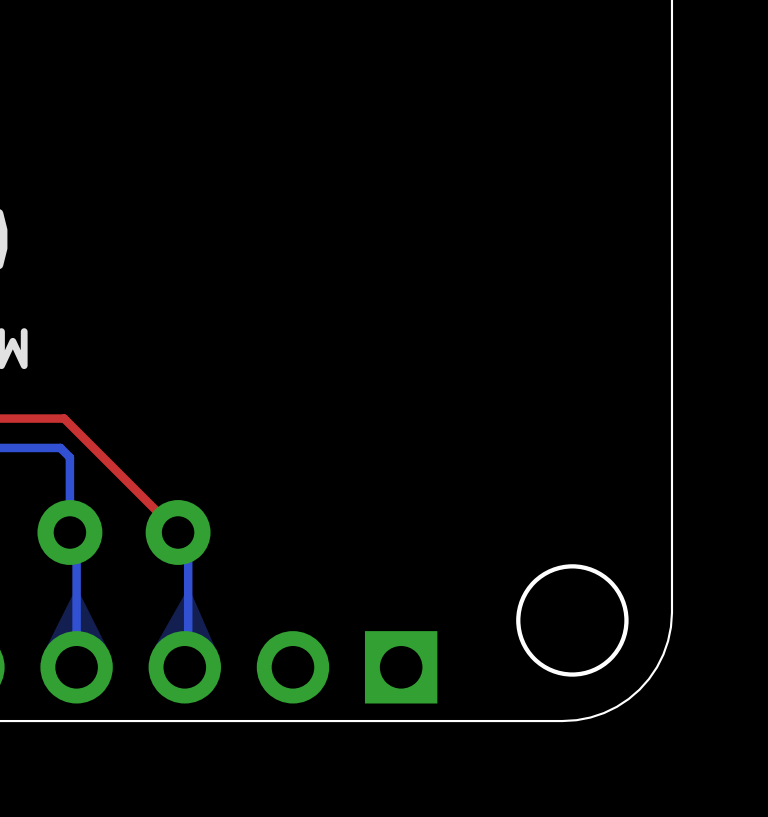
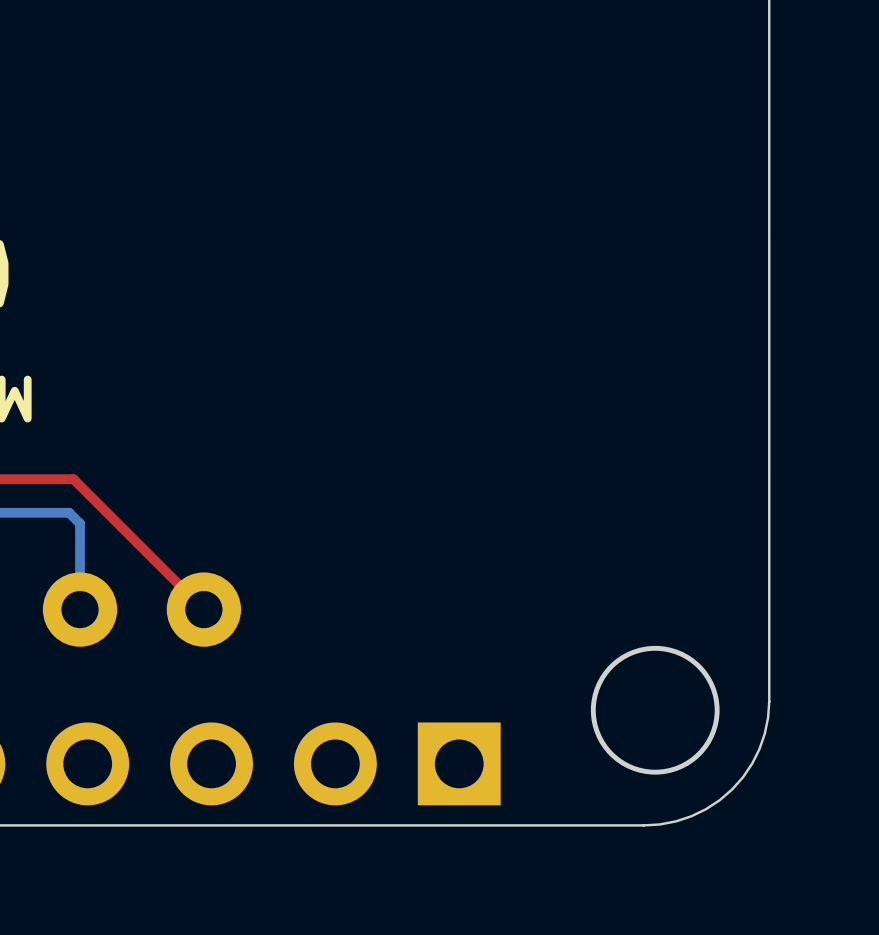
bottom track: (69, 532) (76, 539) (76, 667) -> none
bottom track: (178, 532) (188, 542) (188, 639) (184, 643) (184, 667) -> none

